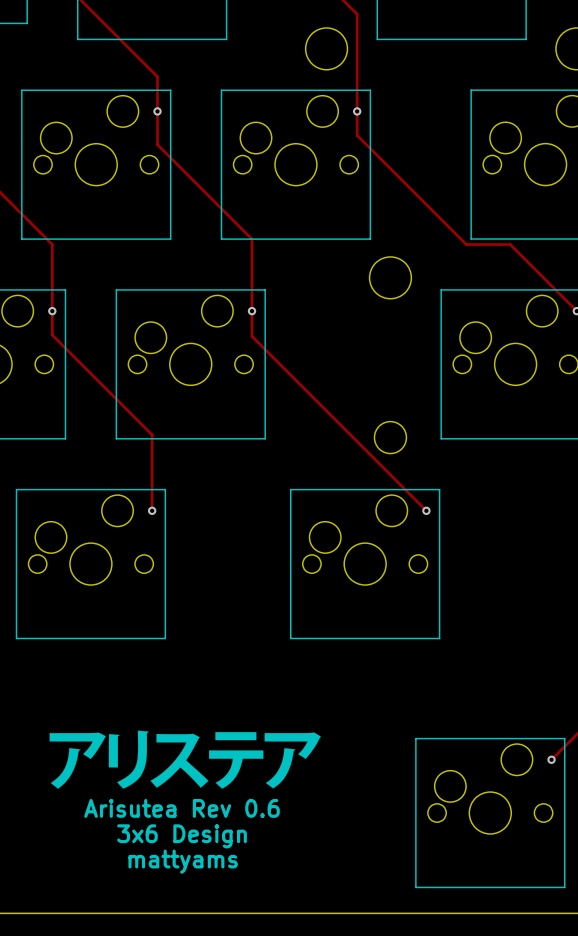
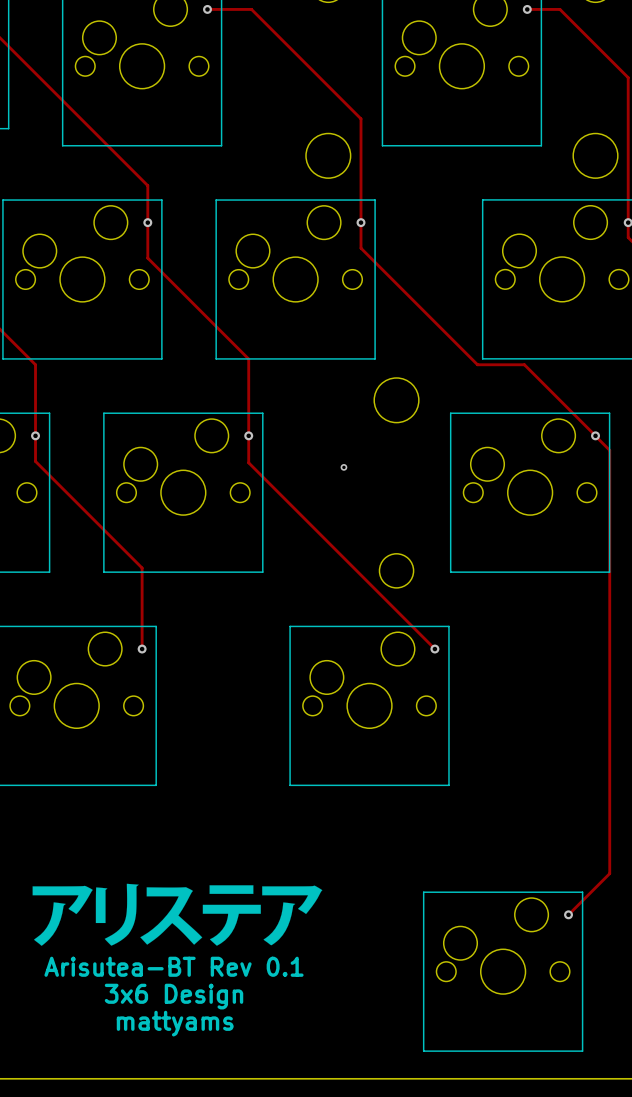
via: none -> (343, 467)
text: Arisutea Rev 0.6 (182, 808) -> Arisutea-BT Rev 0.1 (174, 966)

